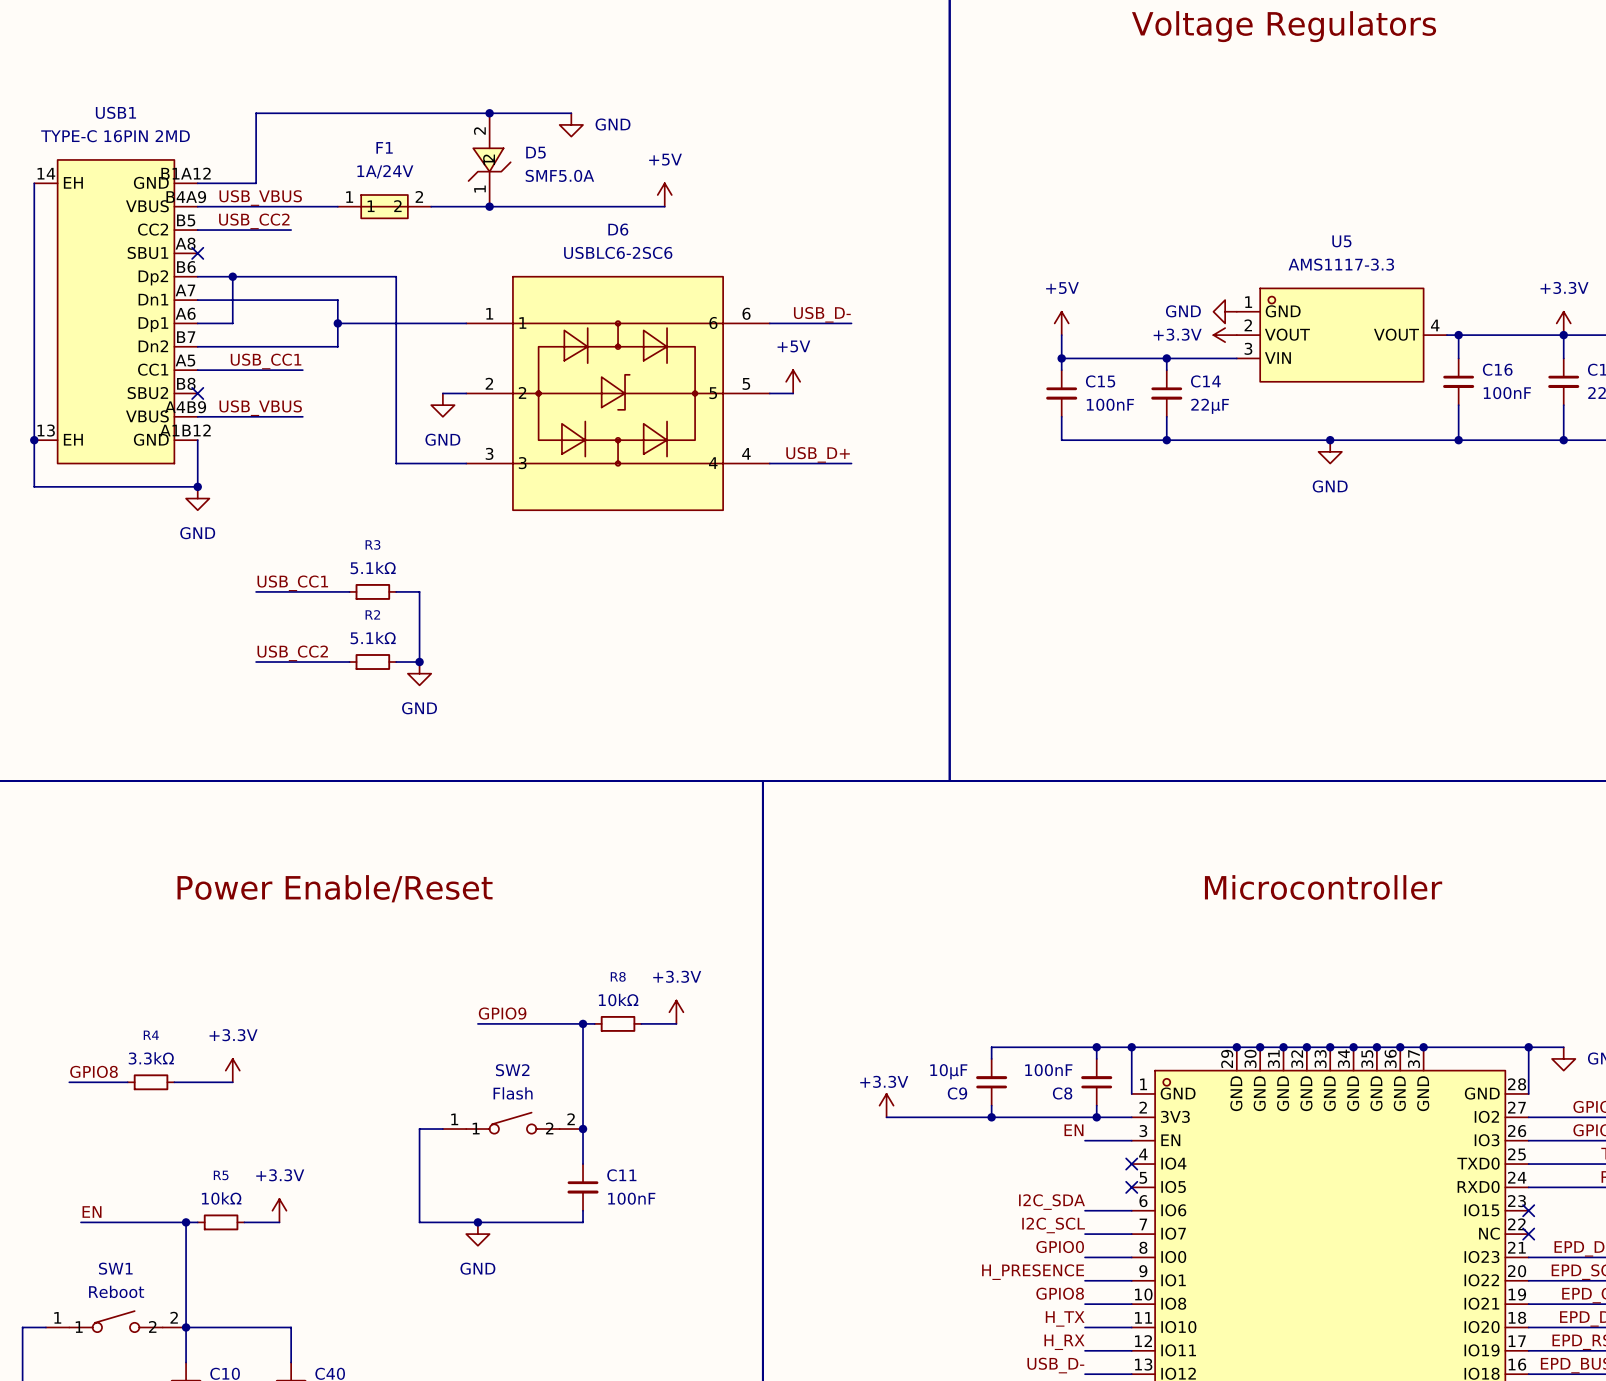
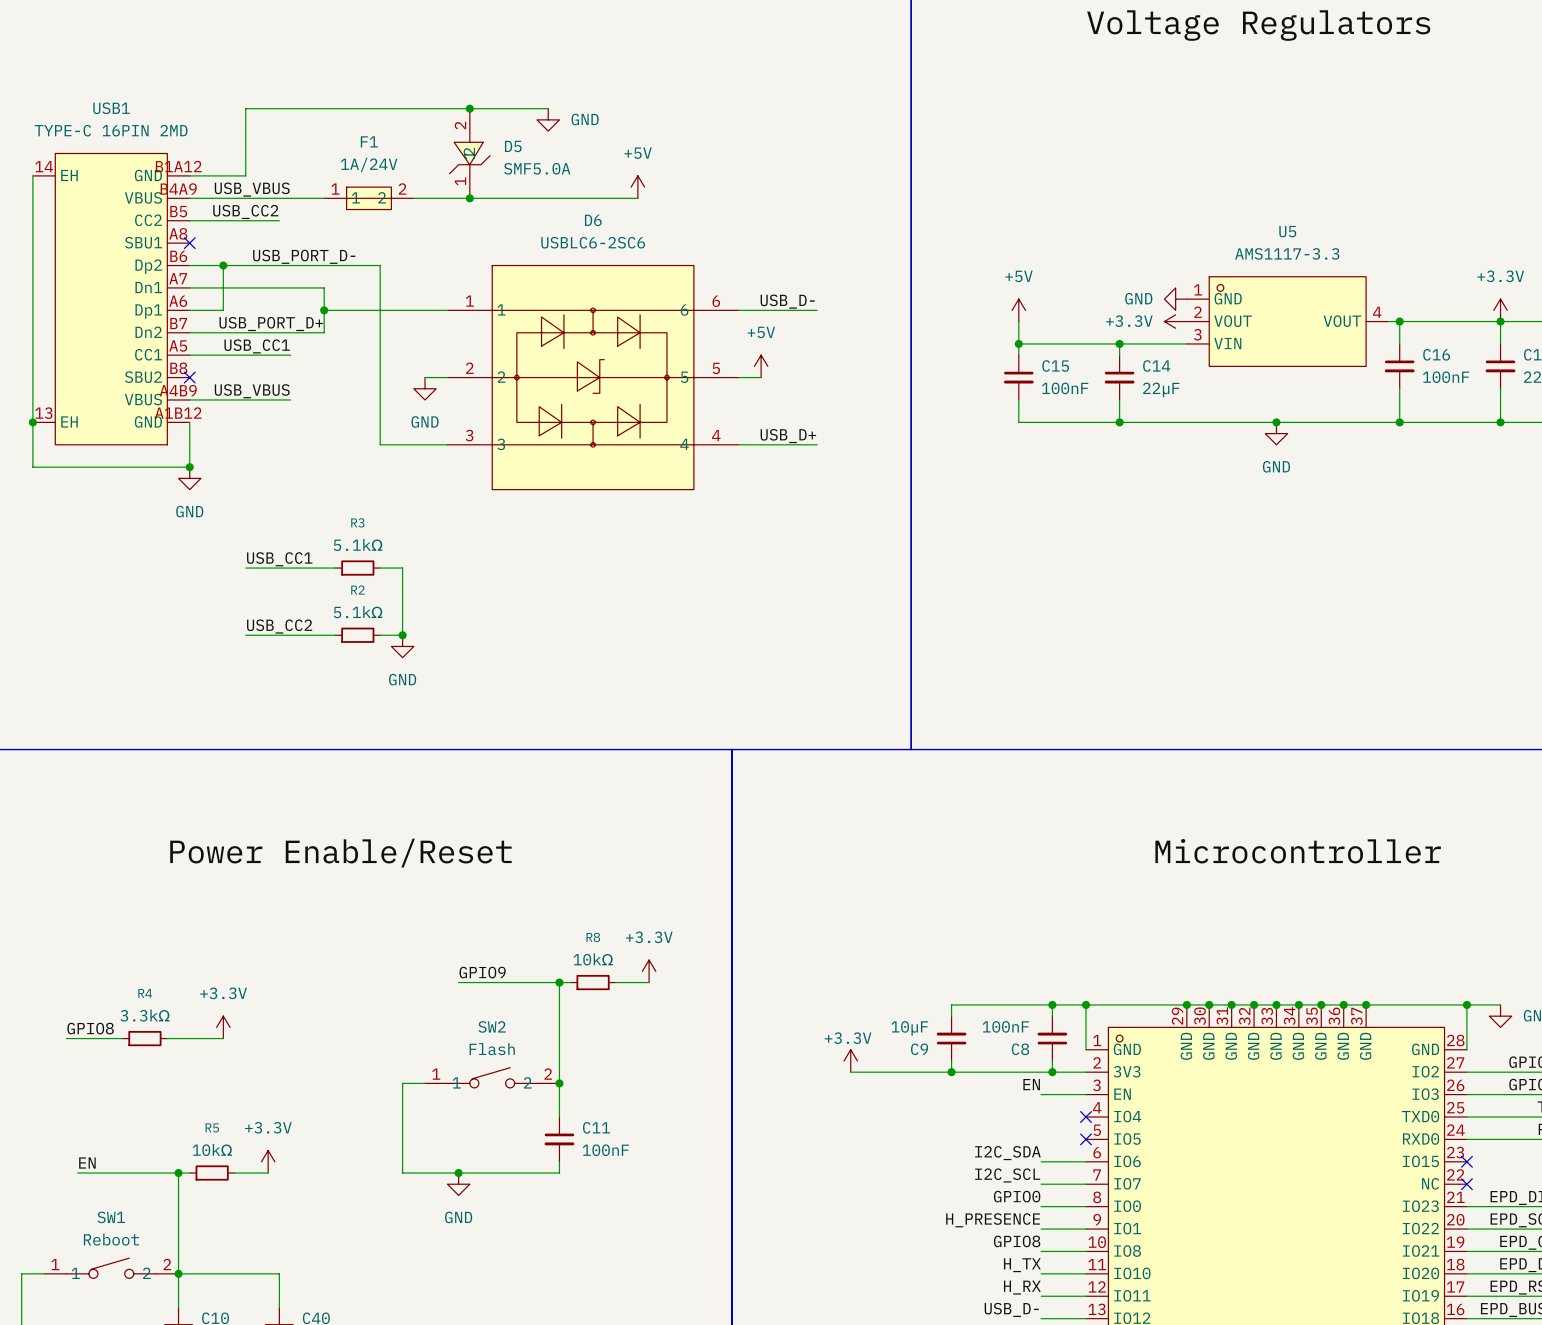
label: none -> USB_PORT_D- (304, 256)
label: none -> USB_PORT_D+ (271, 324)

